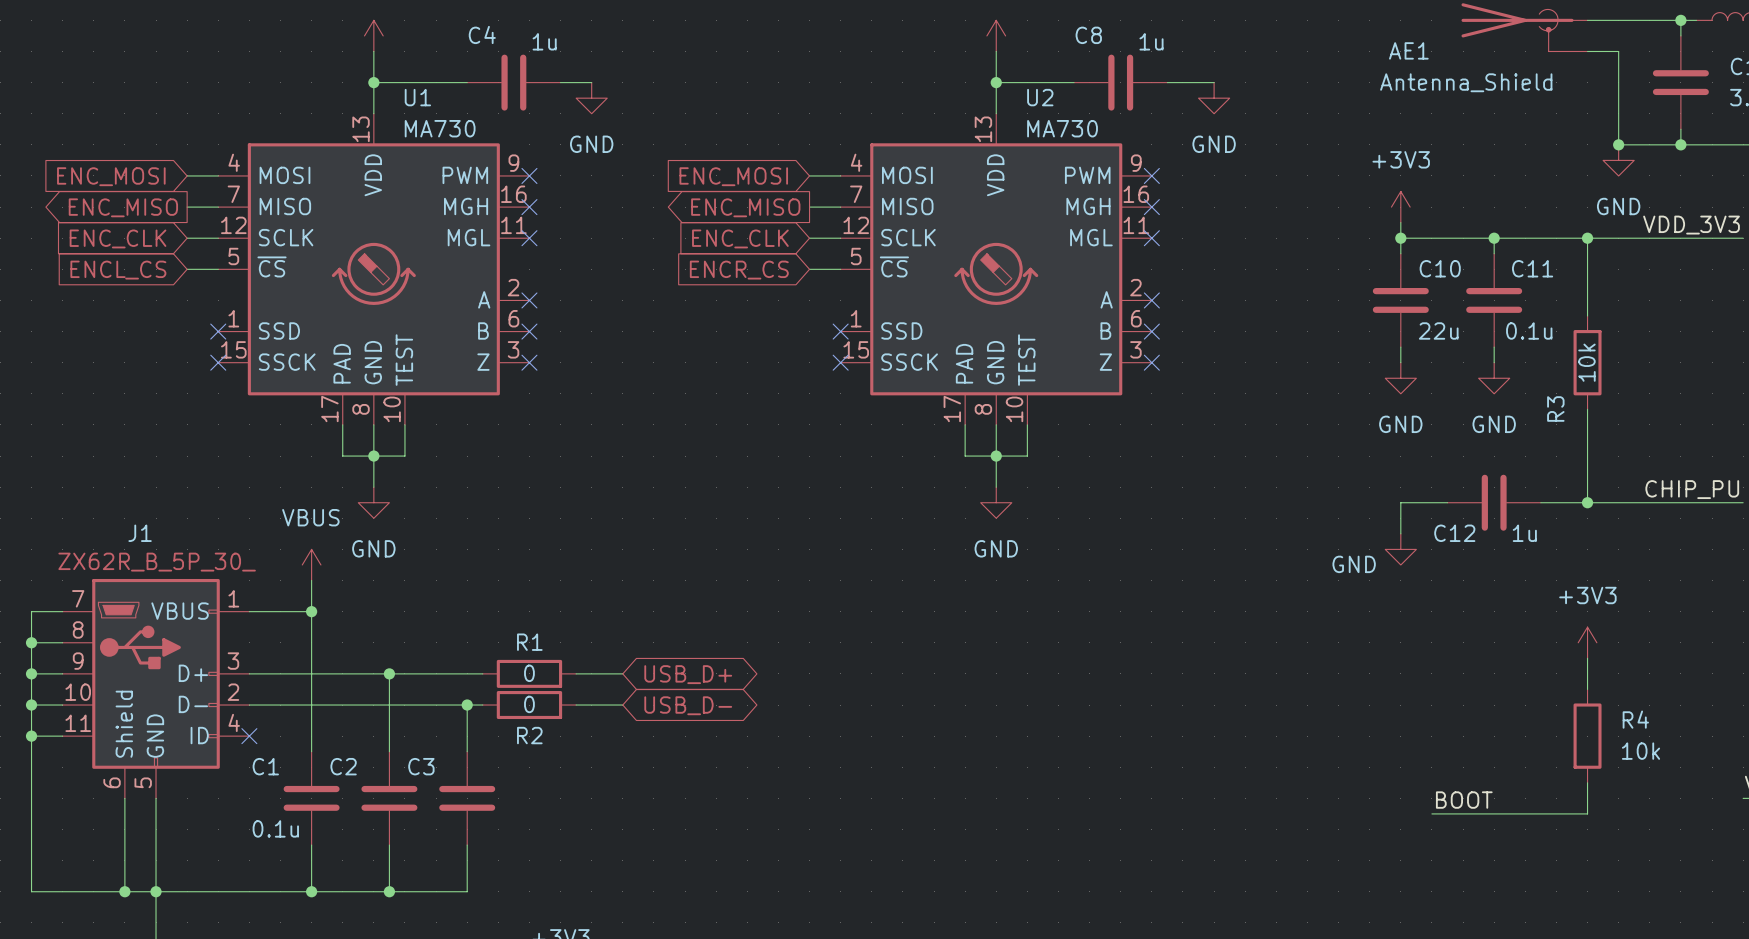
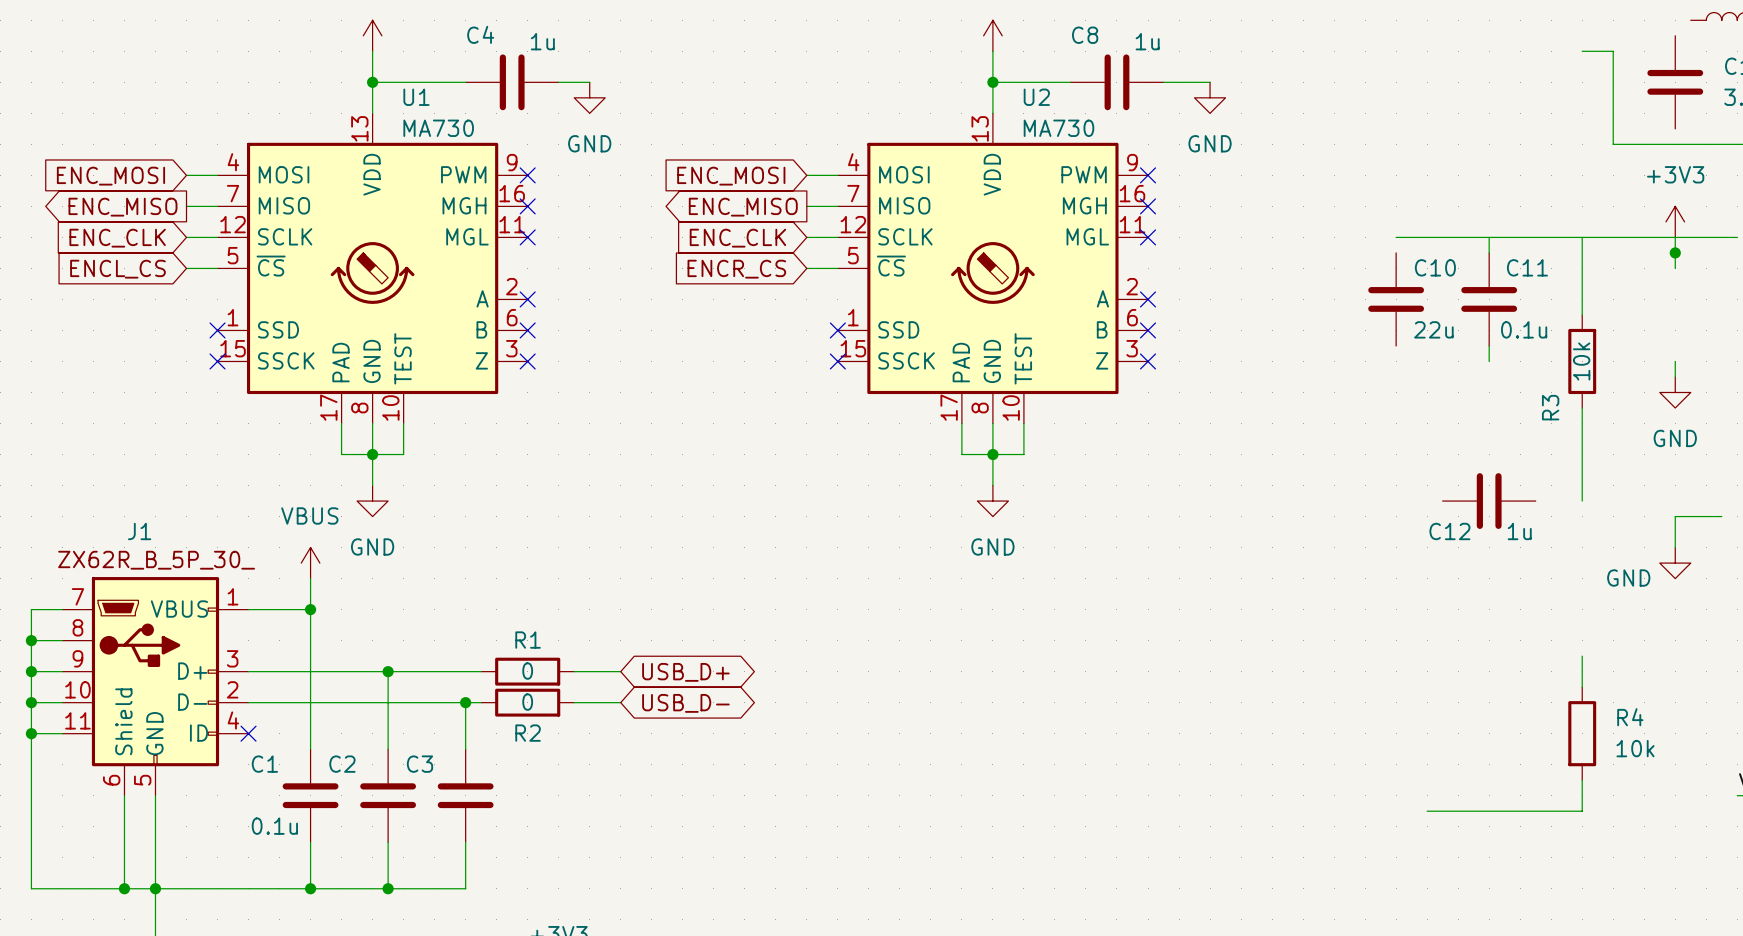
wire: (1587, 20) (1696, 20) -> none
wire: (1680, 20) (1680, 35) -> none
junction: (1680, 20) -> none
AE1: Antenna_Shield (1524, 27) -> none
wire: (1680, 129) (1680, 144) -> none
junction: (1618, 144) -> none
junction: (1680, 144) -> none
power symbol: GND (1618, 160) -> none
power symbol: +3V3 (1400, 207) -> none
wire: (1400, 222) (1400, 253) -> (1675, 237) (1675, 268)
power symbol: none -> +3V3 (1675, 221)
label: VDD_3V3 (1691, 225) -> none
junction: (1400, 238) -> none
junction: (1494, 238) -> none
junction: (1587, 238) -> none
junction: none -> (1675, 252)
wire: (1400, 347) (1400, 362) -> (1675, 361) (1675, 376)
power symbol: GND (1400, 378) -> none
power symbol: GND (1494, 378) -> none
power symbol: none -> GND (1675, 392)
label: CHIP_PU (1692, 489) -> none
wire: (1447, 502) (1400, 502) (1400, 533) -> (1721, 516) (1675, 516) (1675, 547)
wire: (1540, 502) (1743, 502) -> none
junction: (1587, 502) -> none
power symbol: GND (1400, 549) -> none
power symbol: none -> GND (1675, 563)
power symbol: +3V3 (1587, 642) -> none
label: BOOT (1464, 800) -> none

